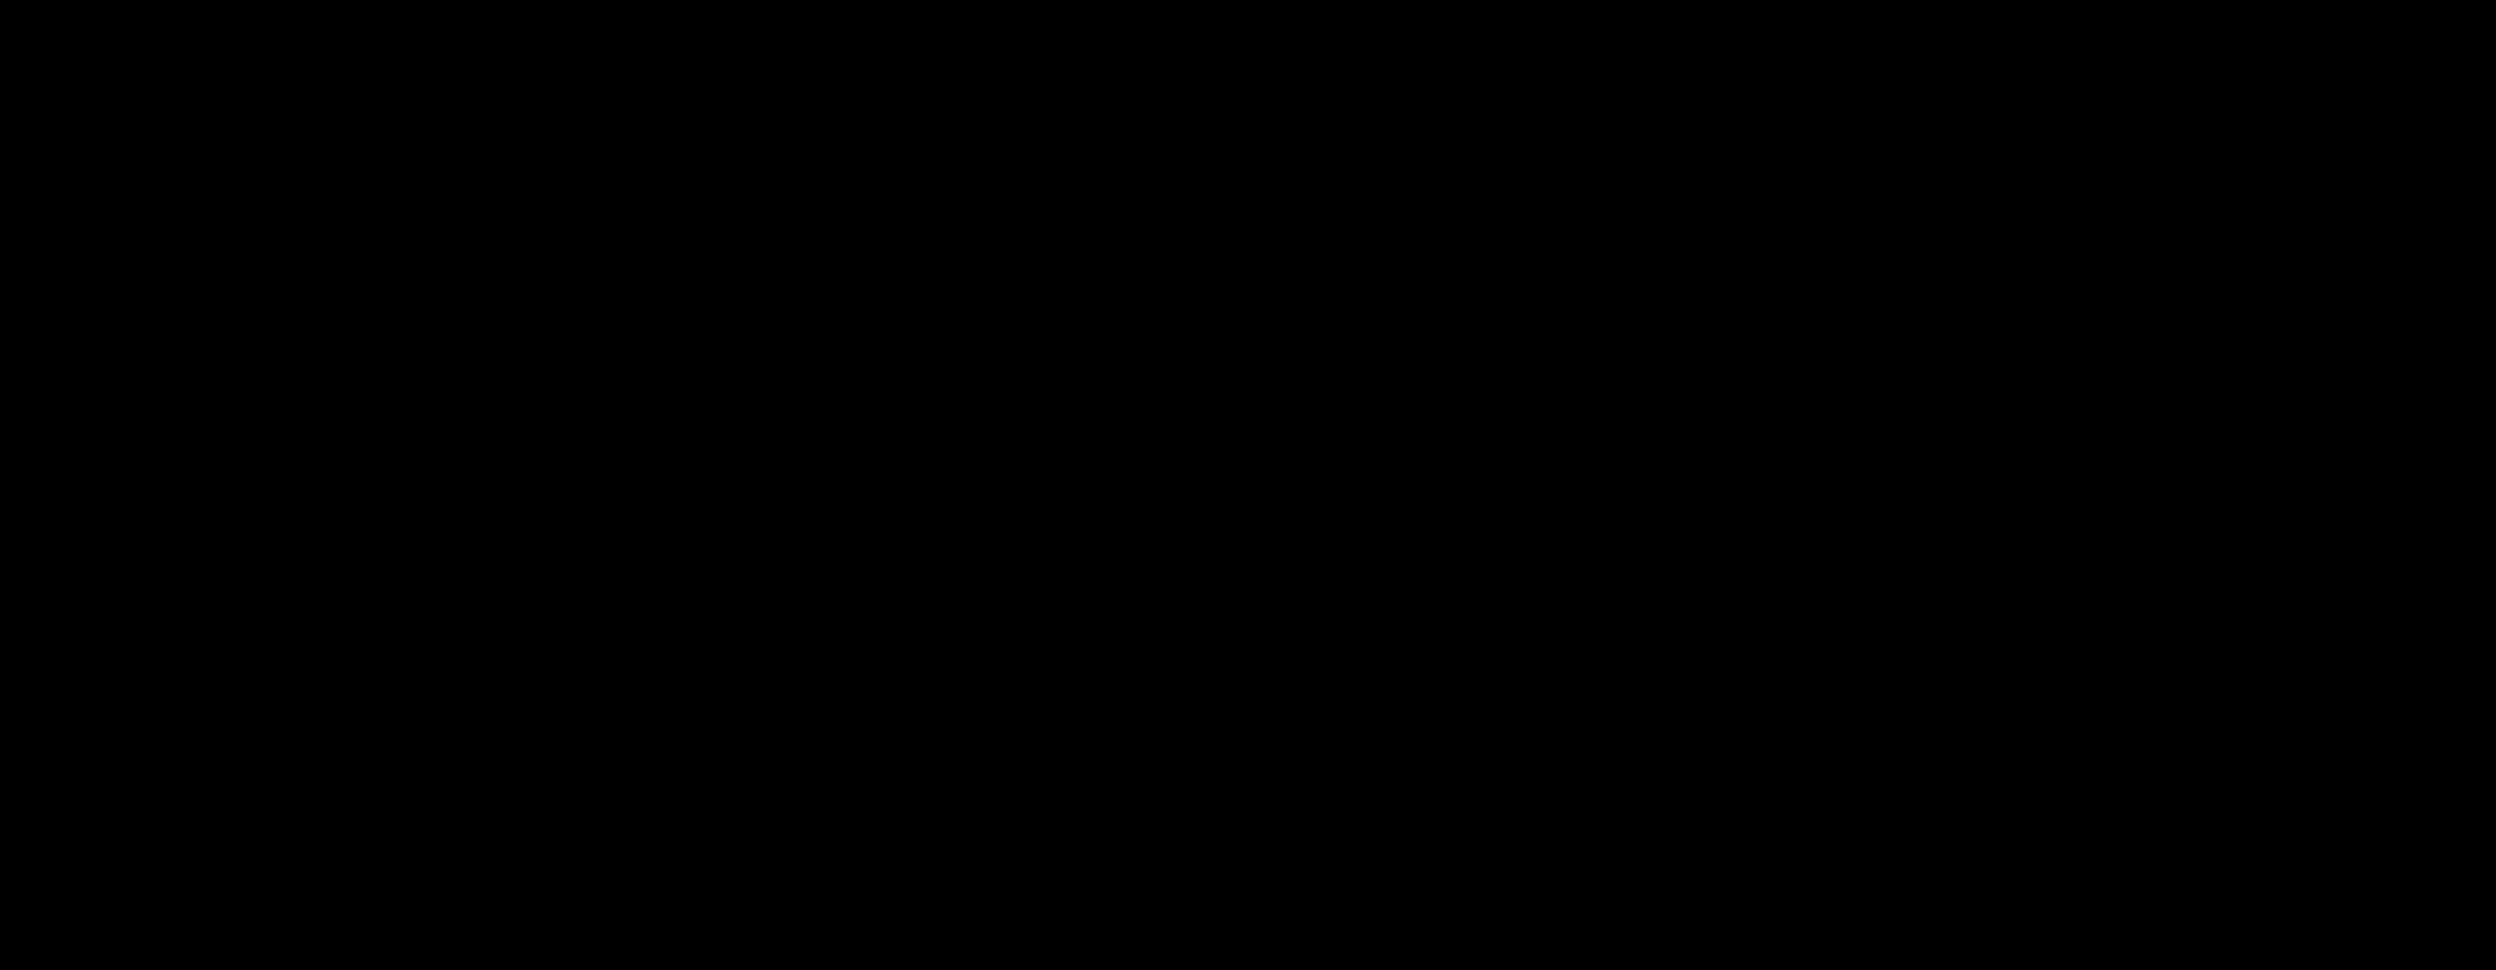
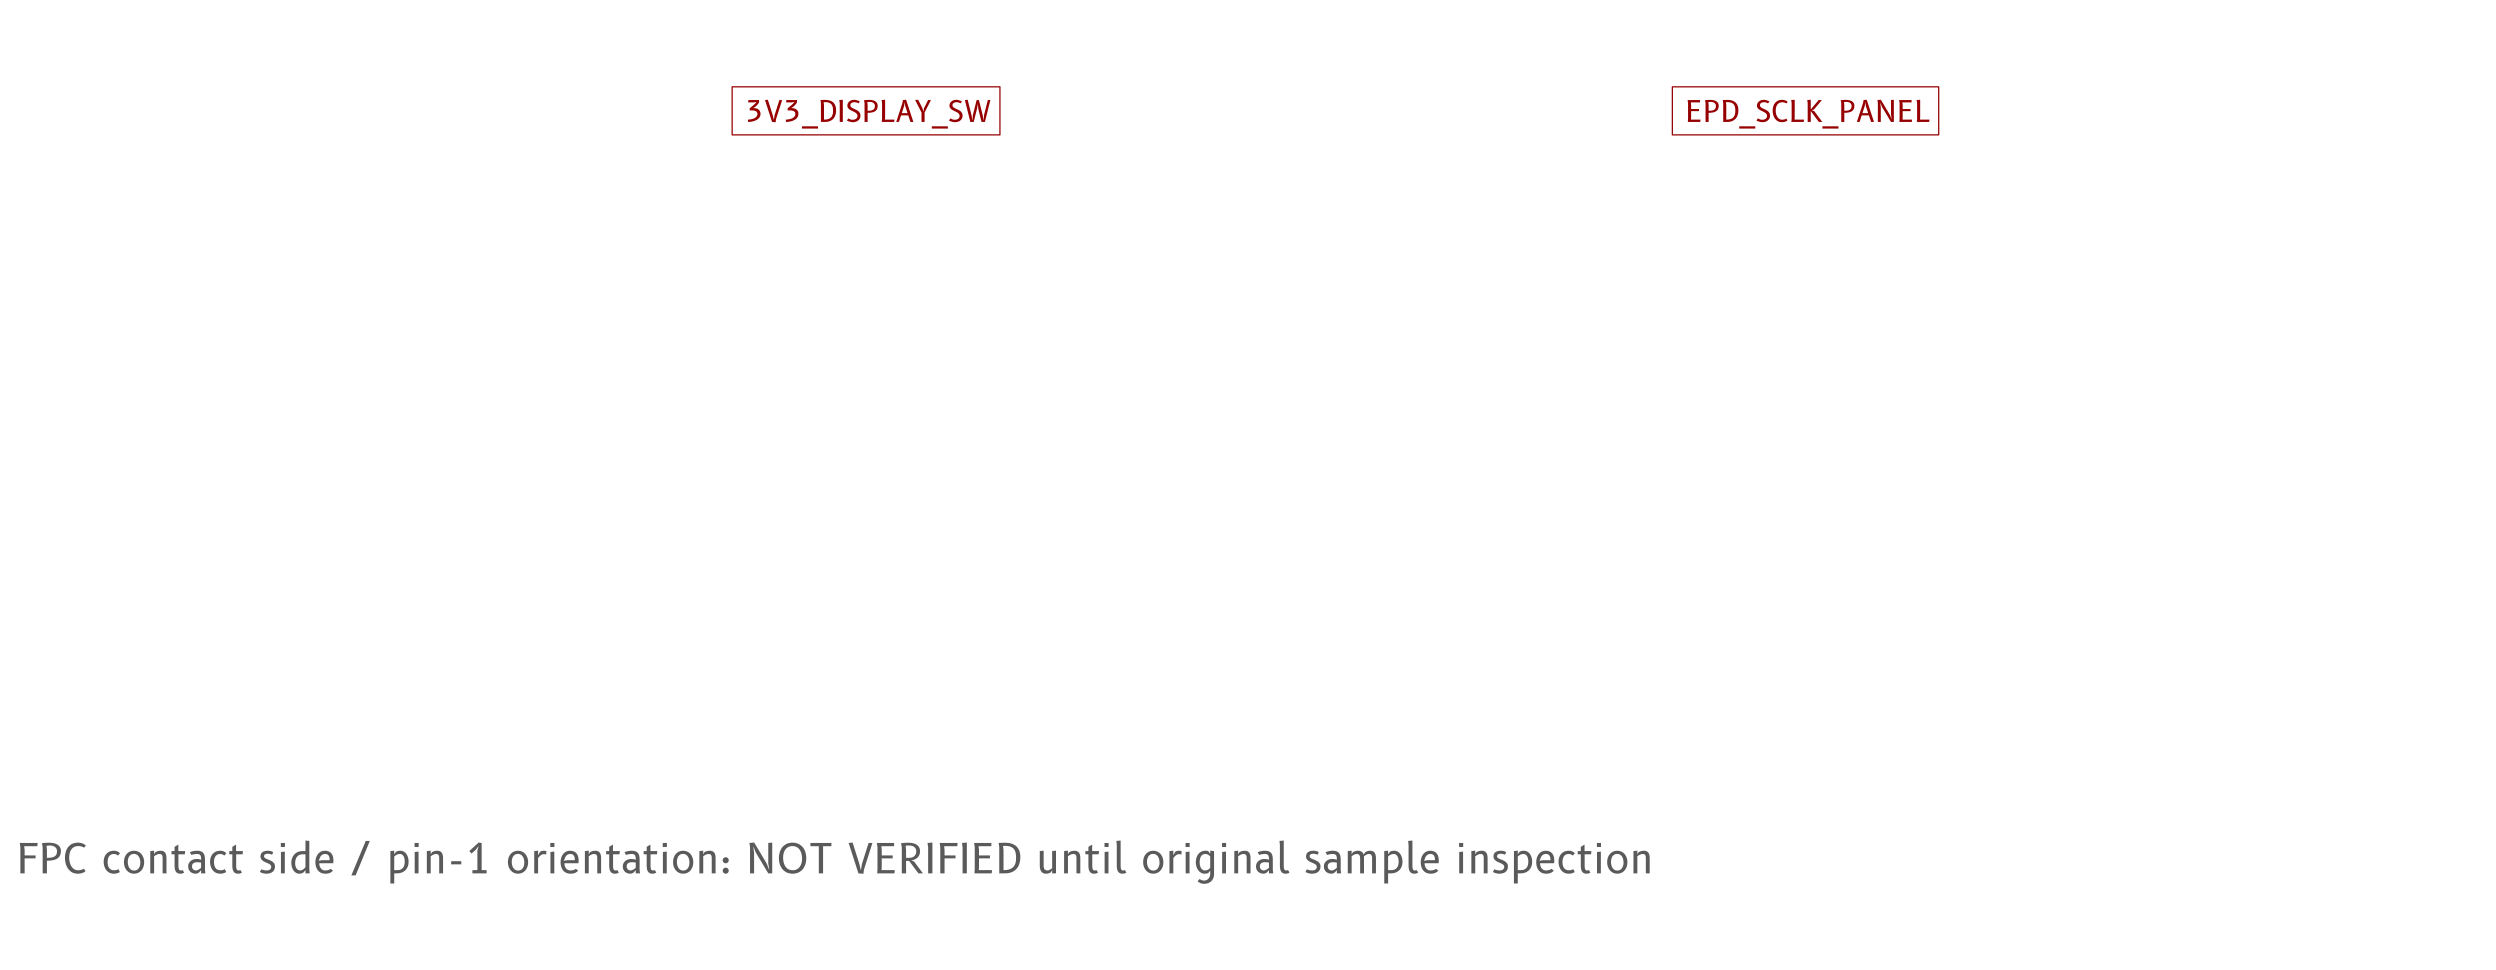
global label: none -> 3V3_DISPLAY_SW (869, 114)
global label: none -> EPD_SCLK_PANEL (1808, 114)
text: none -> FPC contact side / pin-1 orientation: NOT VERIFIED until original sample inspection (834, 862)

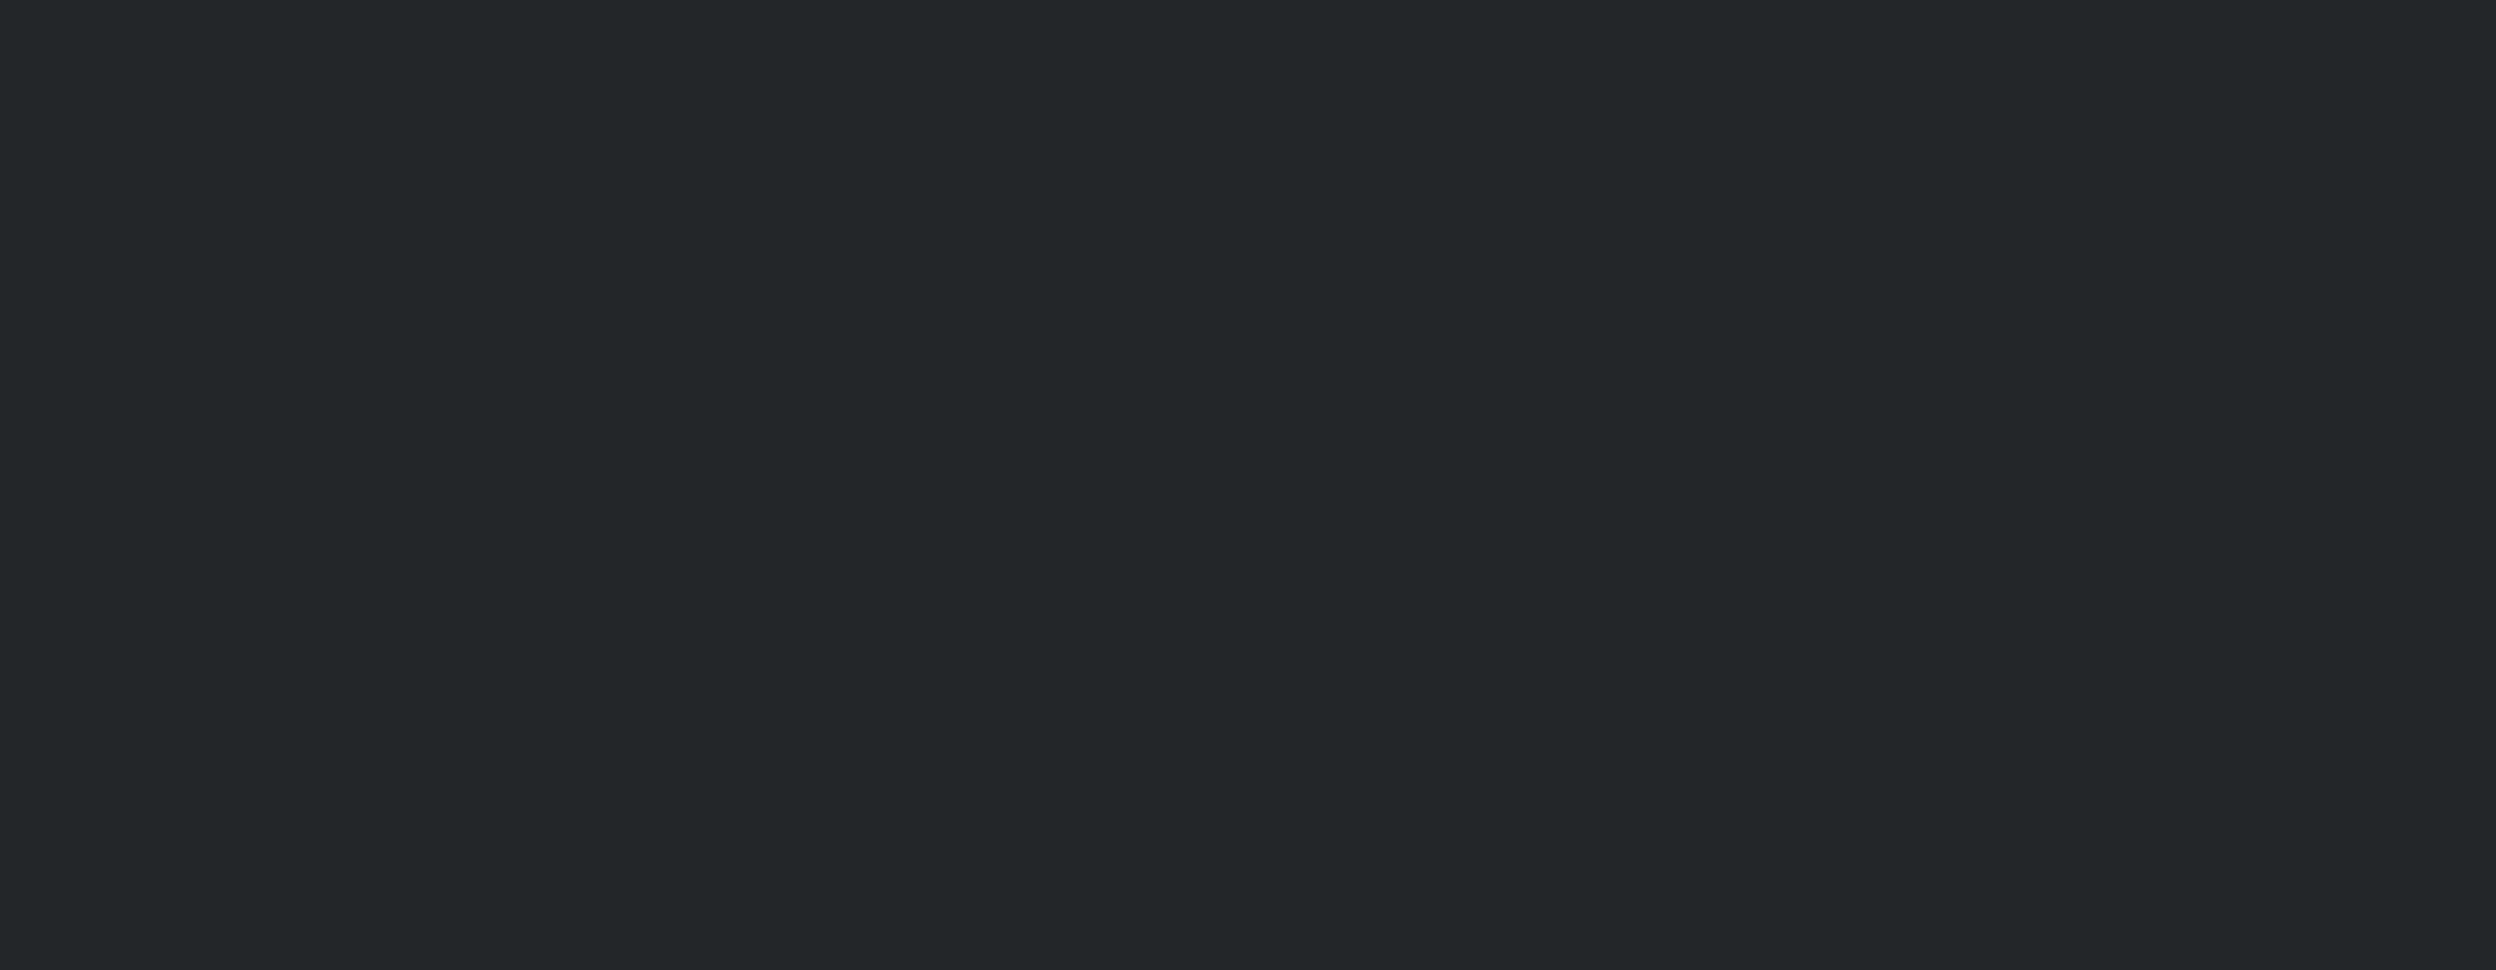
global label: 3V3_DISPLAY_SW (869, 114) -> none
global label: EPD_SCLK_PANEL (1808, 114) -> none
text: FPC contact side / pin-1 orientation: NOT VERIFIED until original sample inspection (834, 862) -> none

